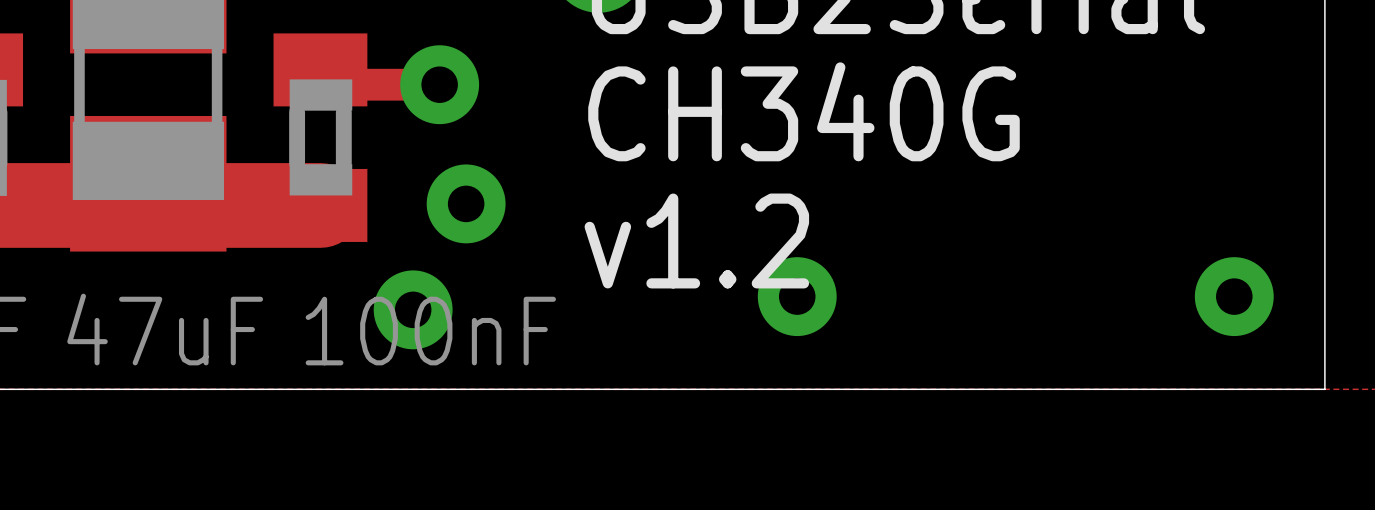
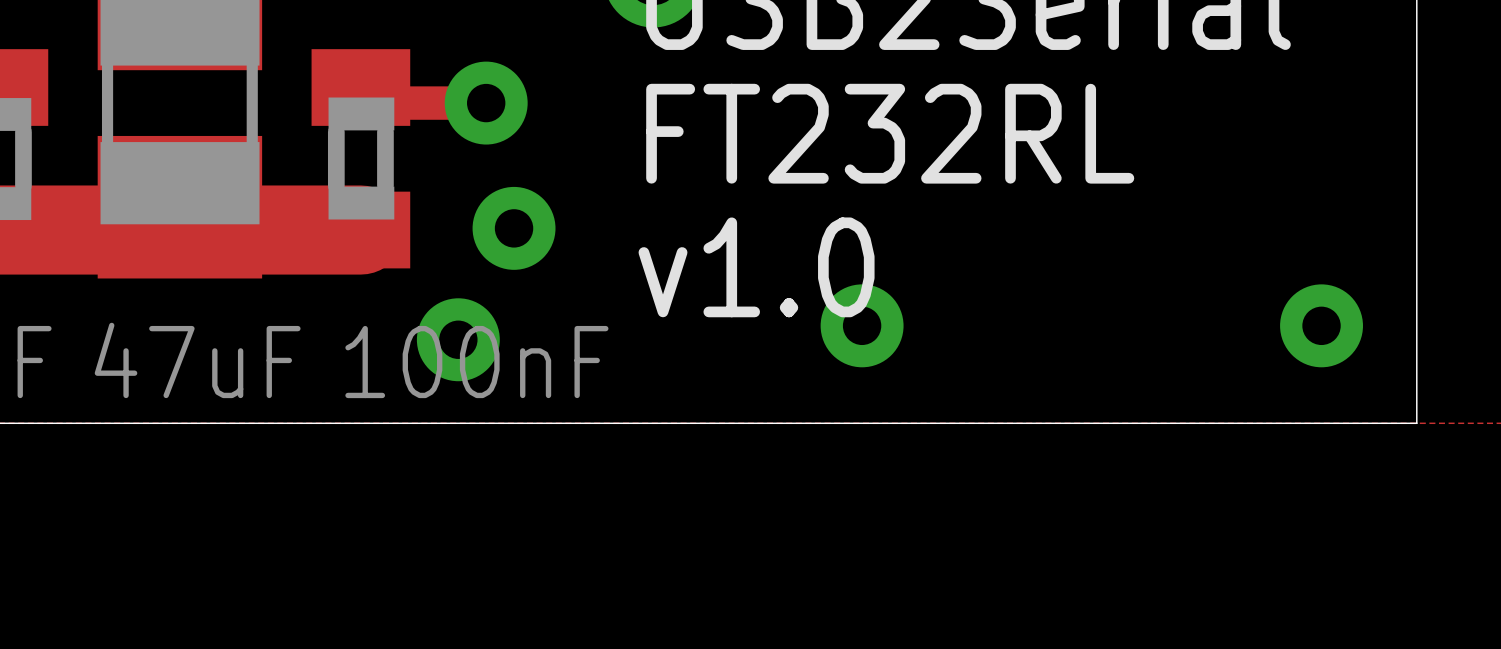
text: CH340G (804, 111) -> FT232RL (890, 133)
text: v1.2 (696, 240) -> v1.0 (756, 267)

